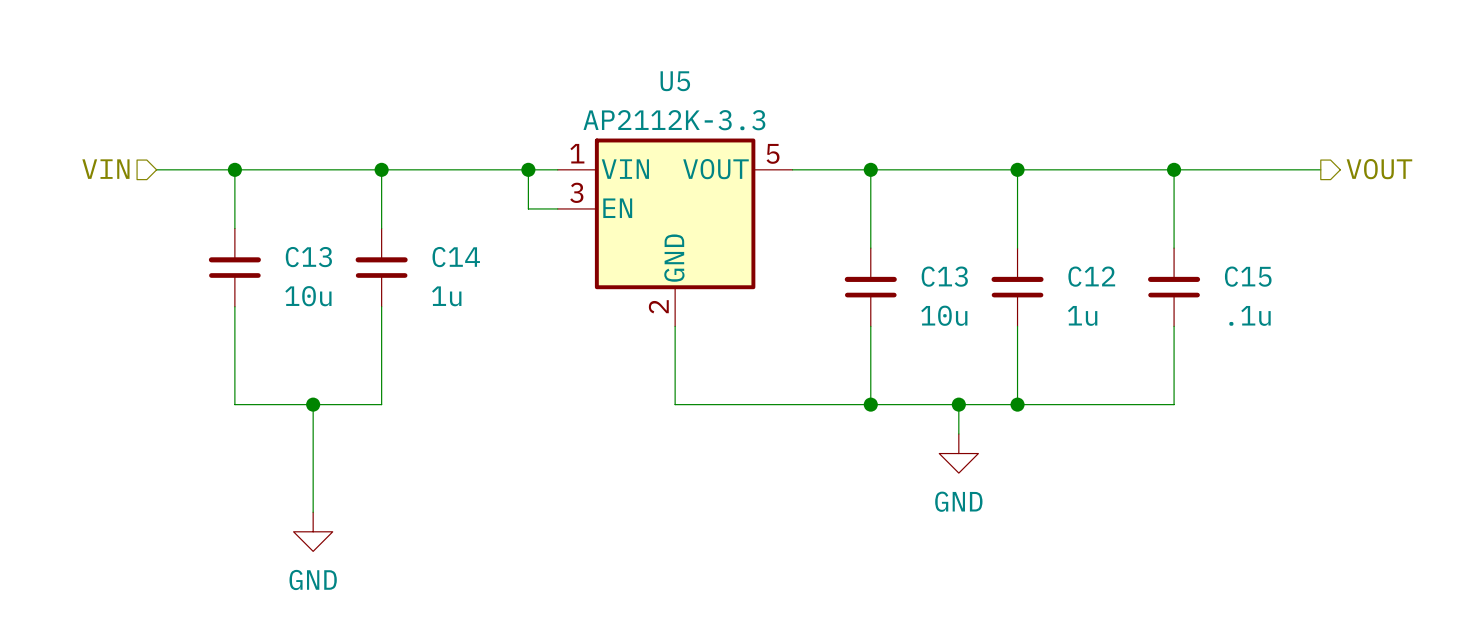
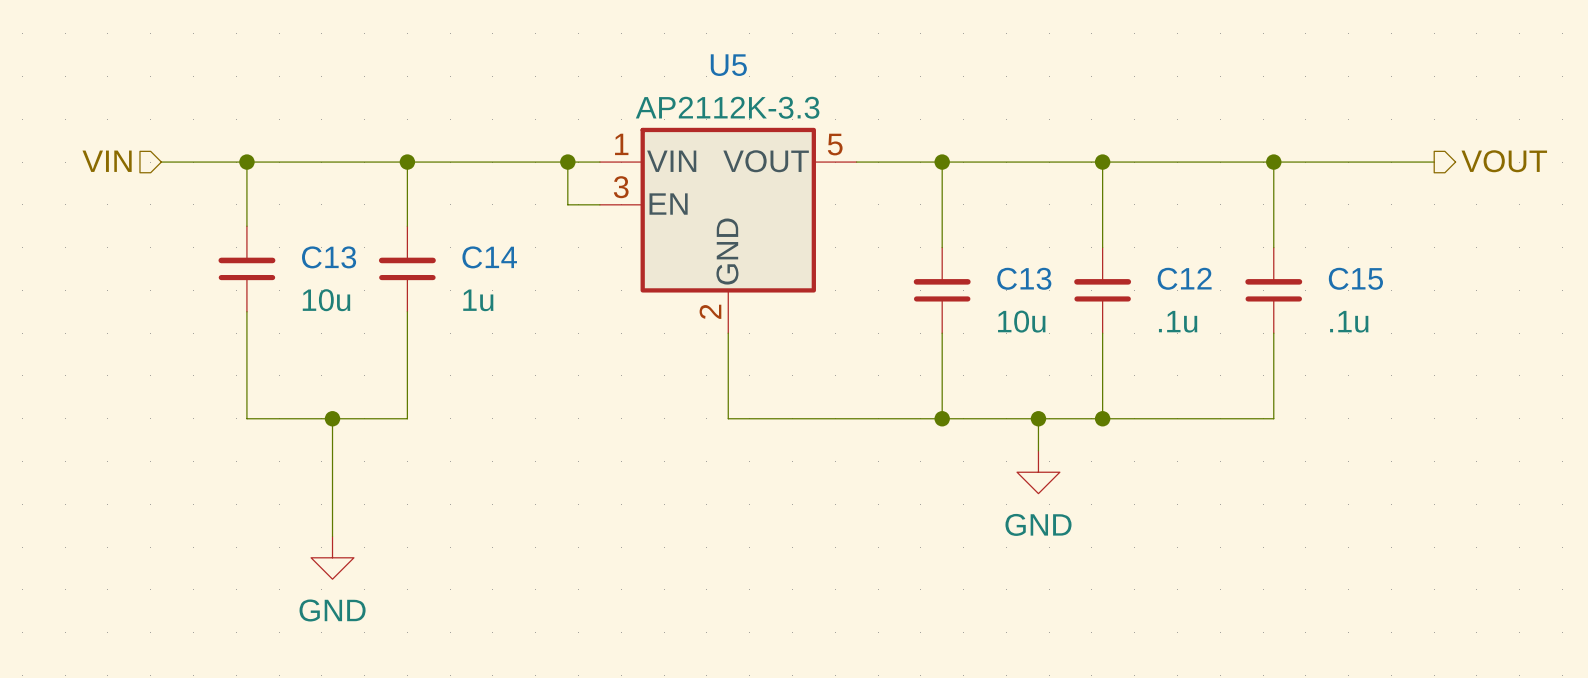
C12 value: 1u (1082, 315) -> .1u (1178, 321)

